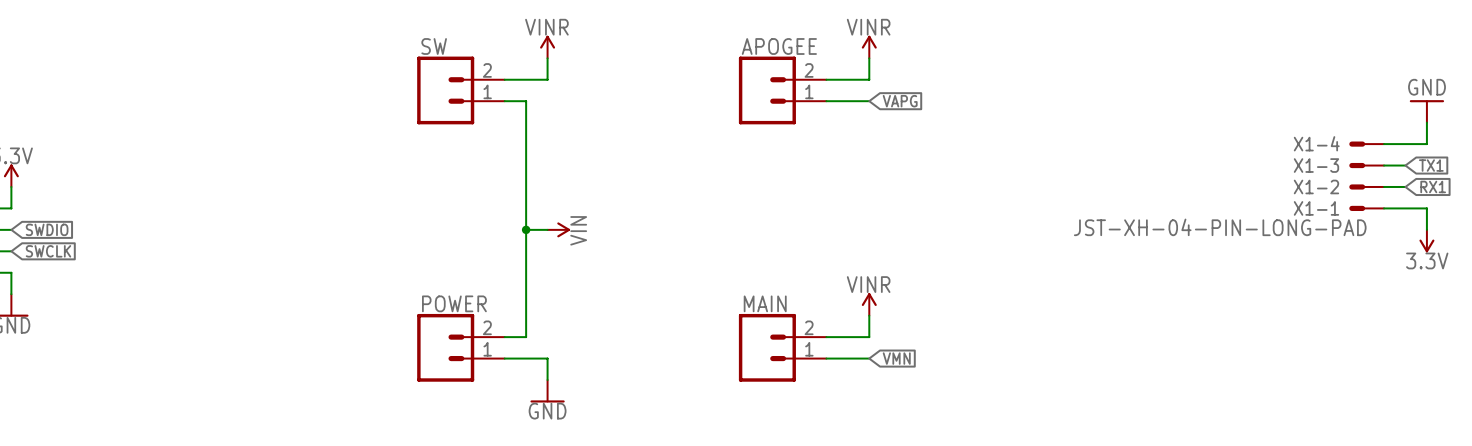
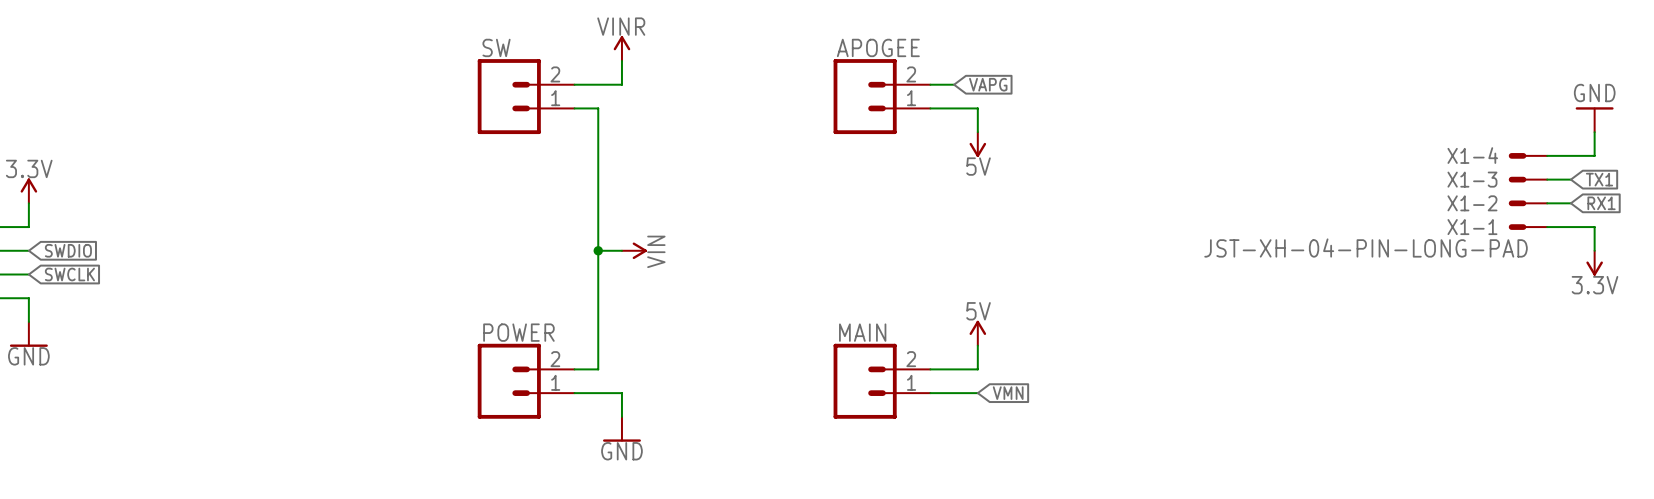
power symbol: VINR (869, 47) -> none
wire: (869, 58) (869, 79) (847, 79) -> none
wire: none -> (977, 108) (977, 132)
global label position: VAPG (900, 101) -> VAPG (988, 84)
power symbol: none -> 5V (977, 144)
power symbol: VINR (869, 304) -> 5V (977, 333)

